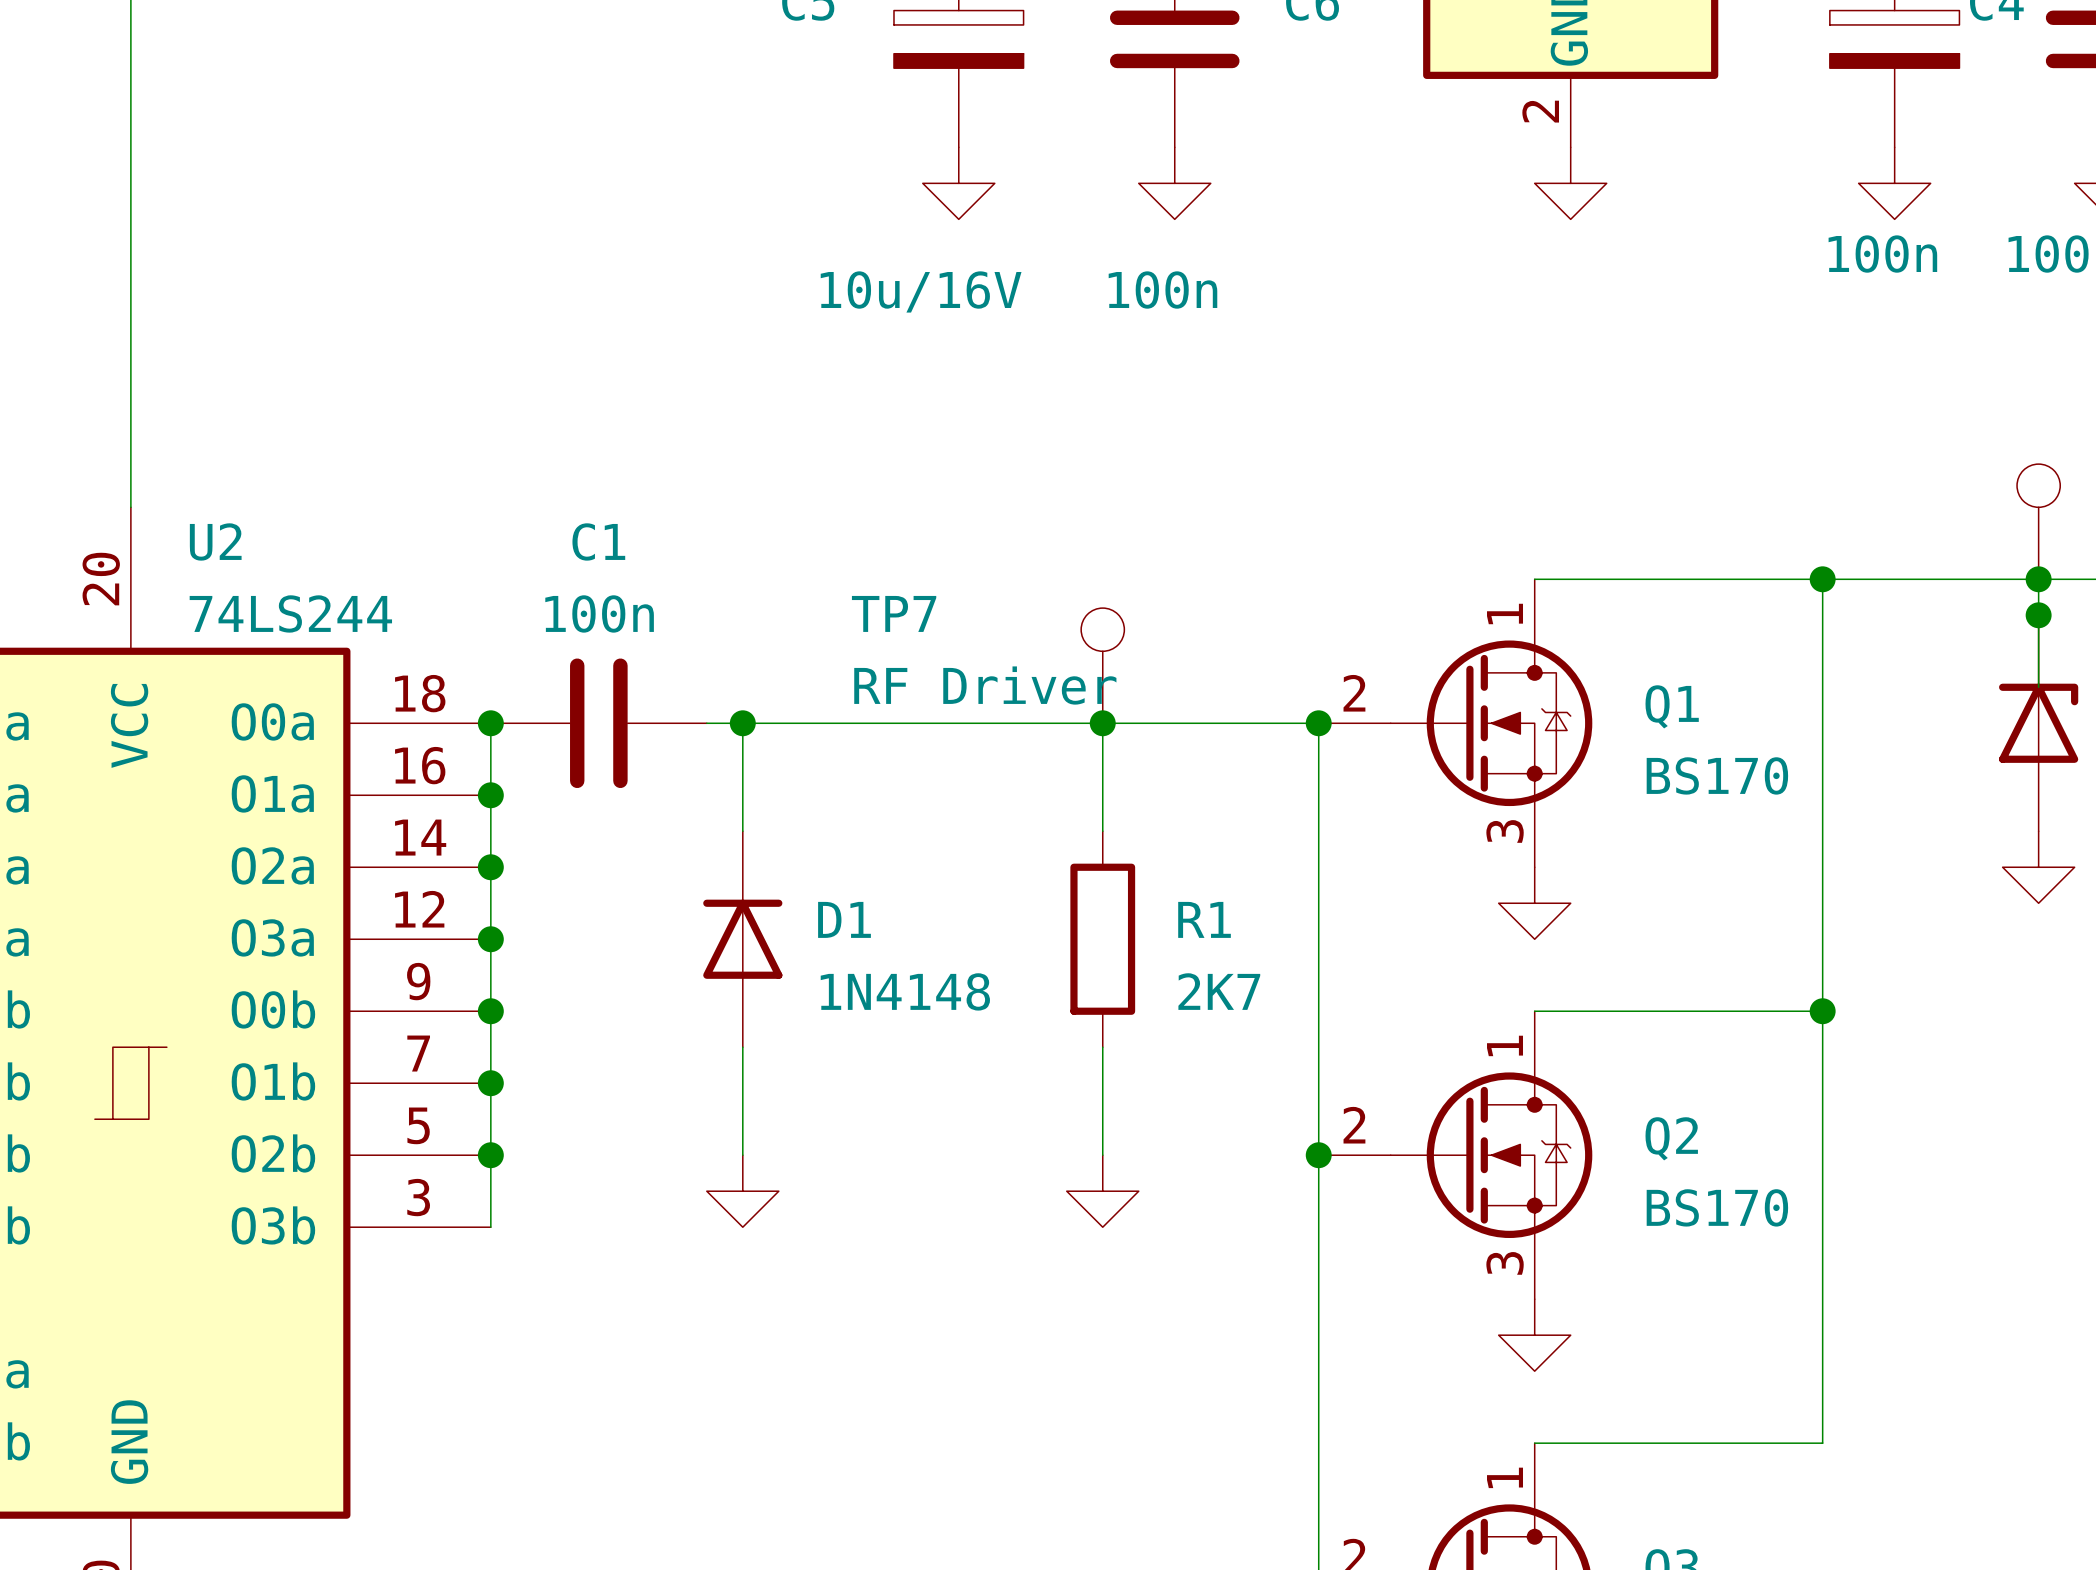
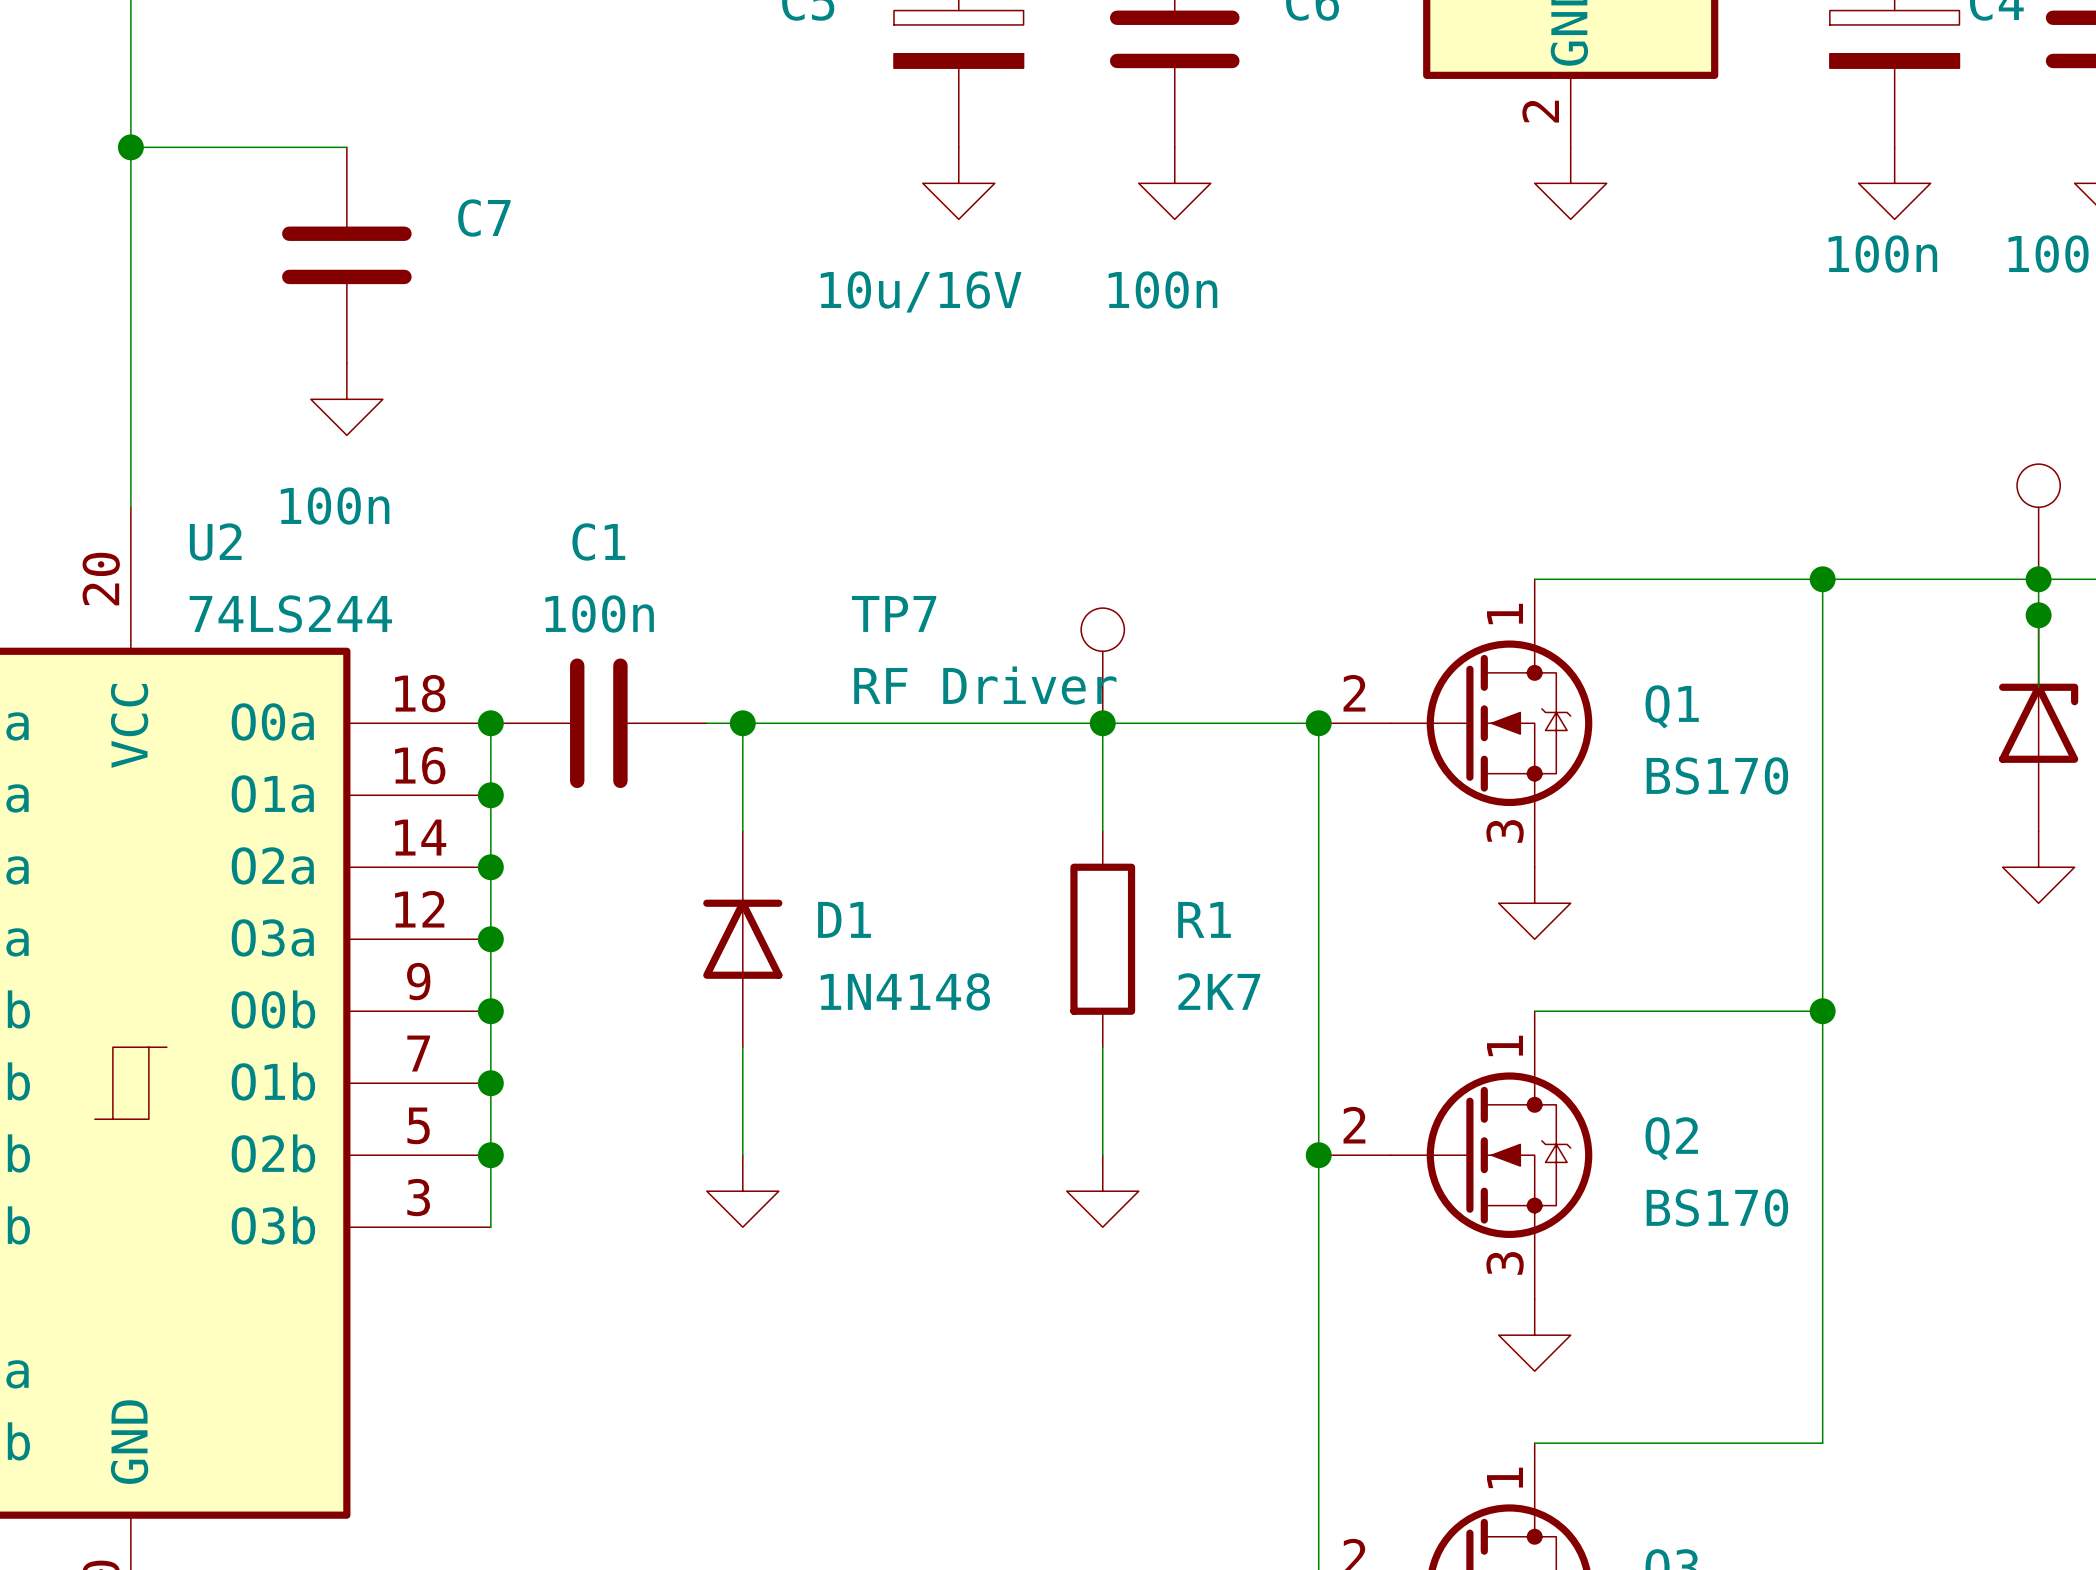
wire: none -> (130, 147) (346, 147)
junction: none -> (130, 147)
C7: none -> 100n (346, 255)
power symbol: none -> (346, 399)

